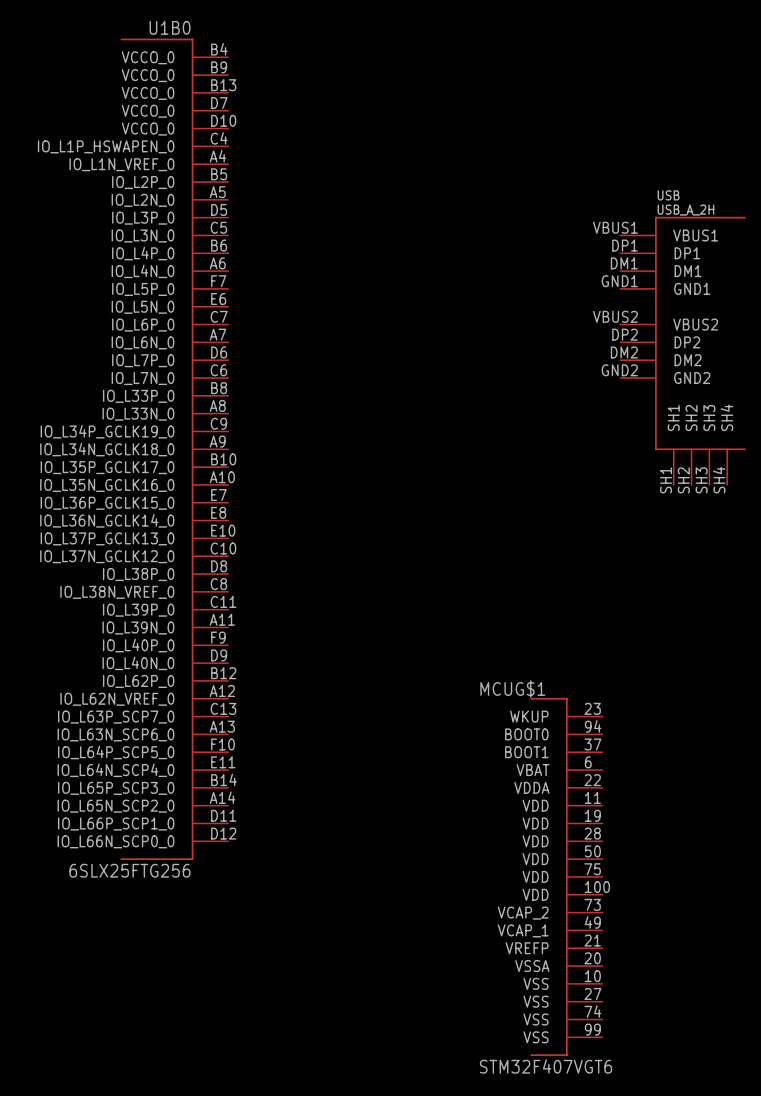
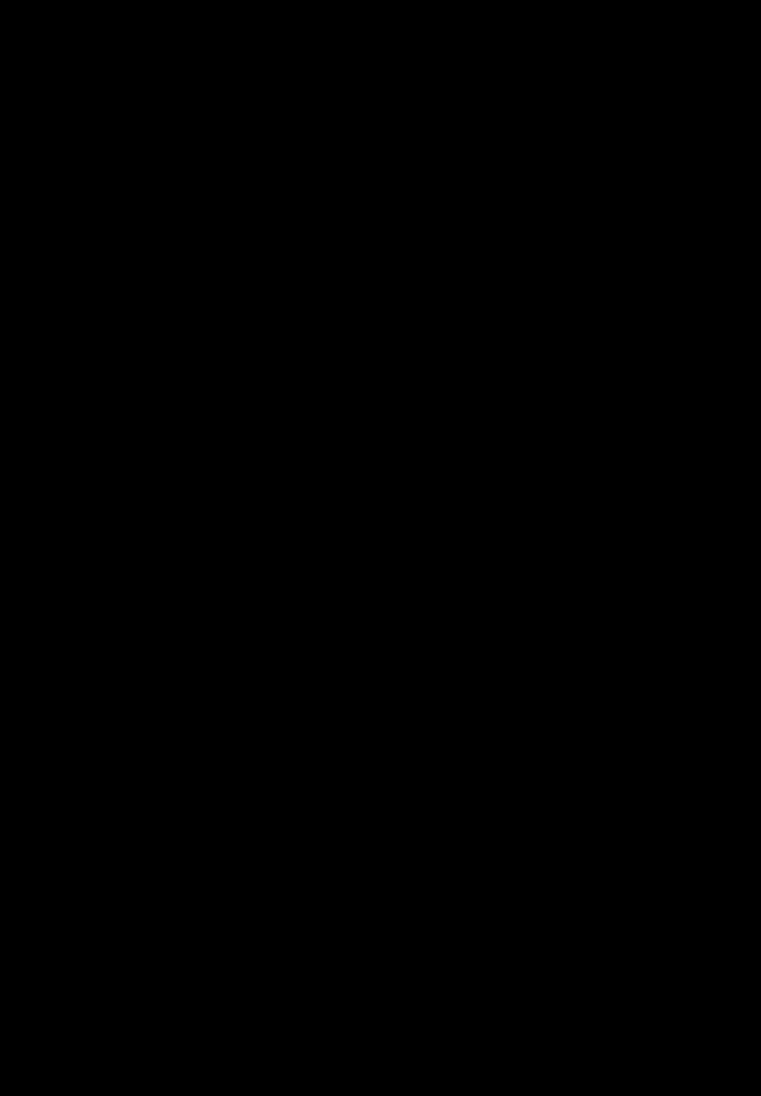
USB: USB_A_2H (683, 350) -> none
U1B0: 6SLX25FTG256 (174, 449) -> none
MCUG$1: STM32F407VGT6 (566, 876) -> none

